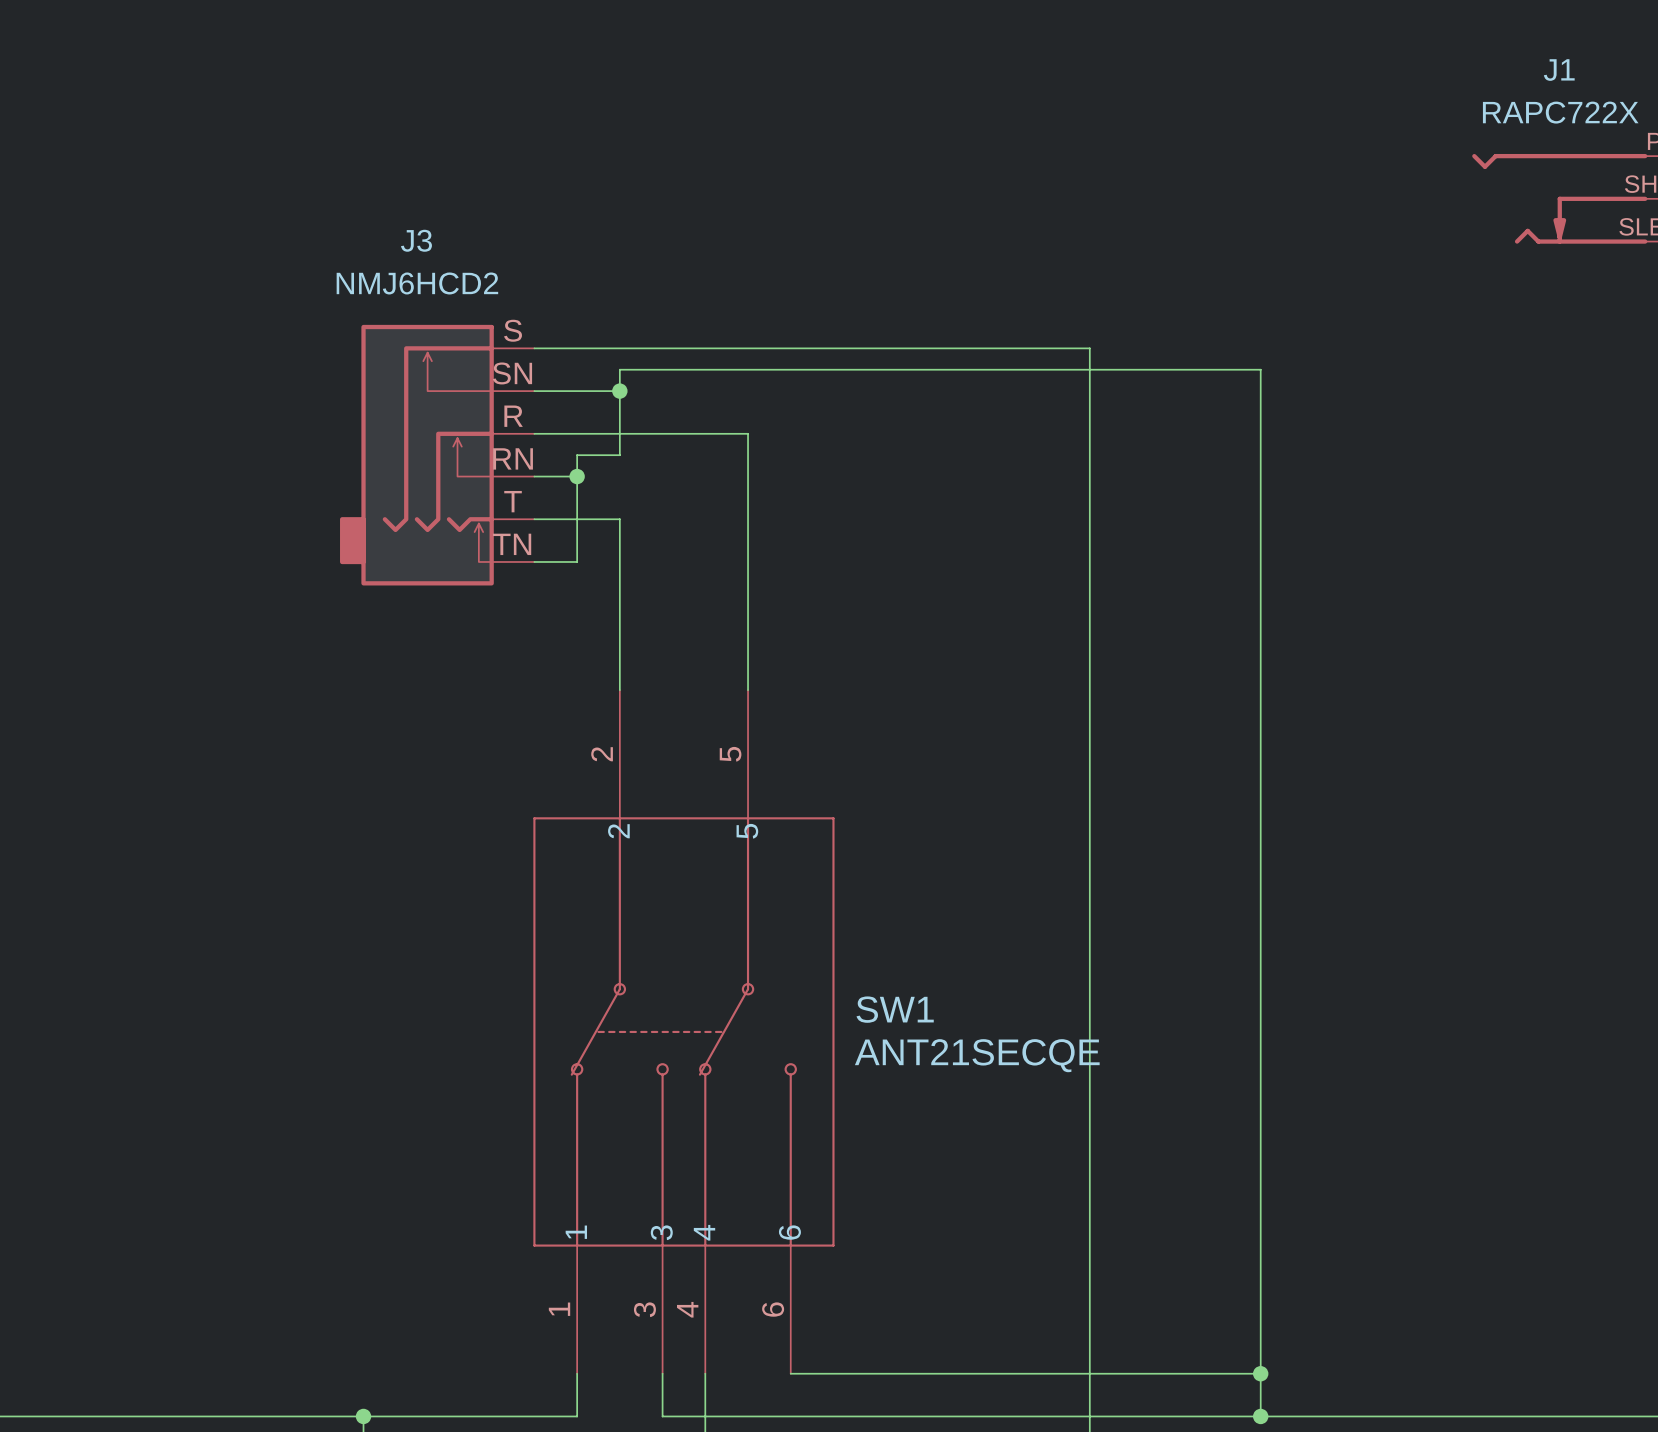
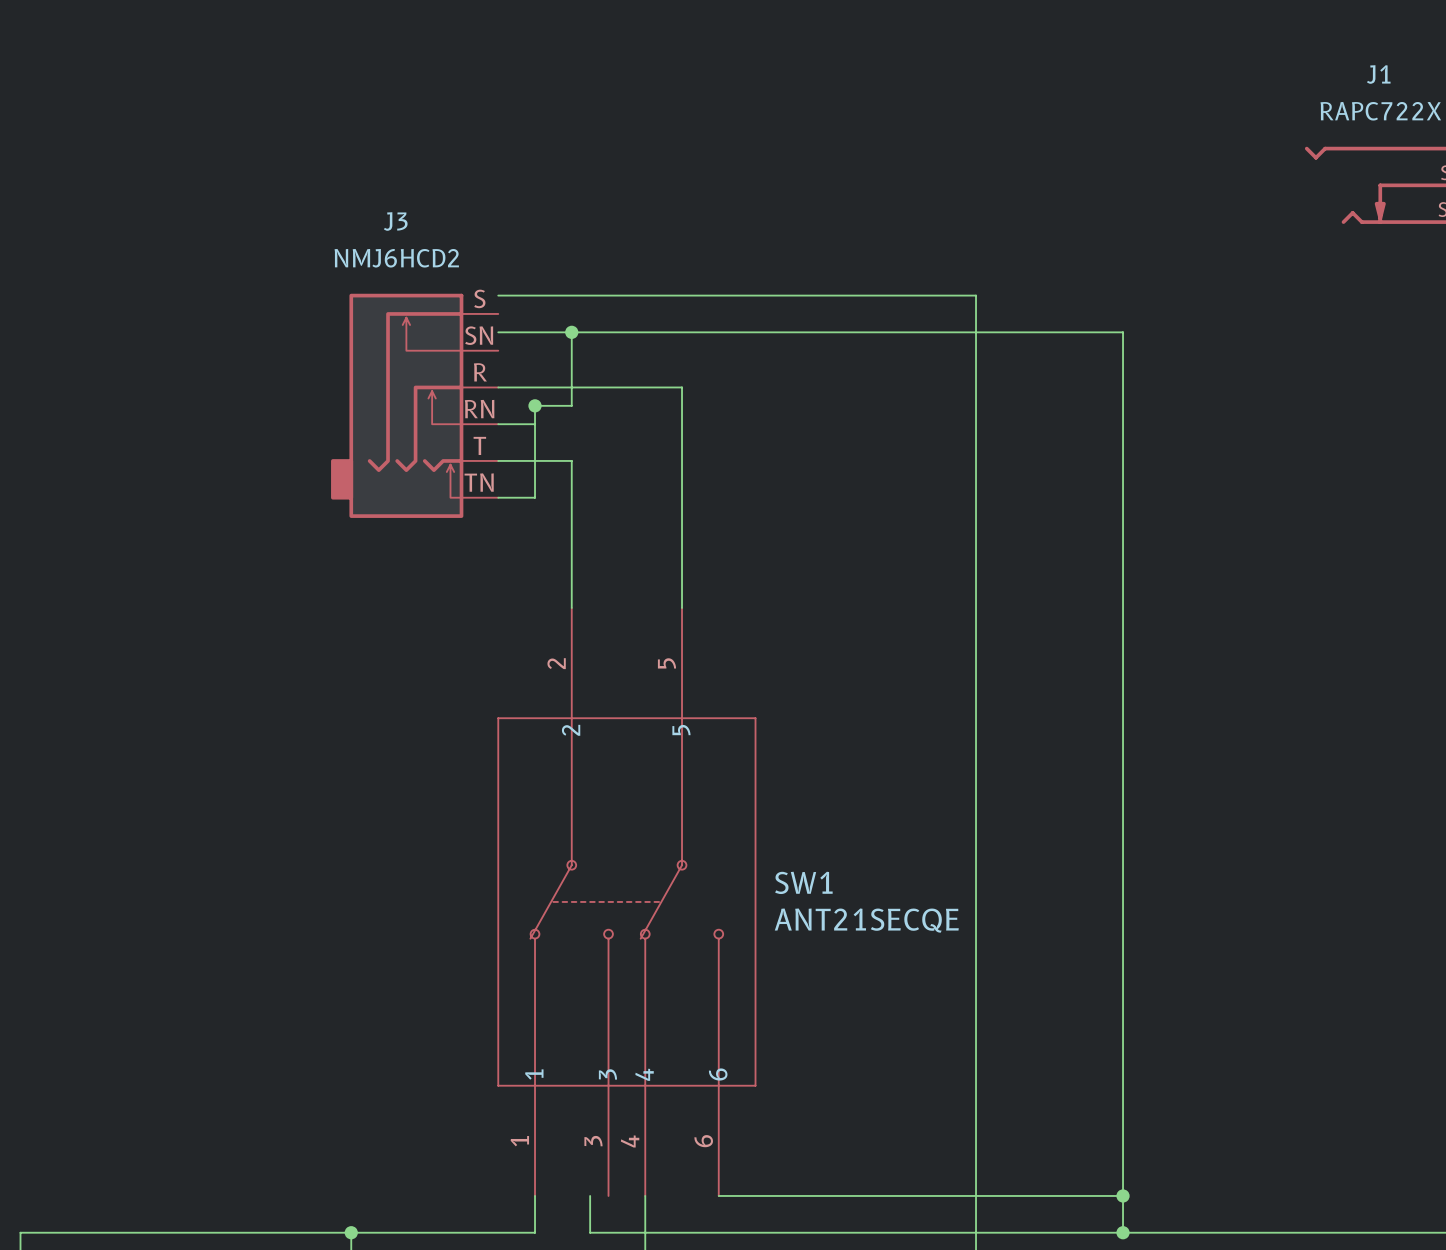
wire: (534, 348) (1089, 348) -> (498, 295) (976, 295) (976, 313)
wire: (534, 391) (619, 391) -> (498, 332) (571, 332)
junction position: (619, 391) -> (571, 332)
junction position: (577, 476) -> (535, 405)
wire: (662, 1373) (662, 1416) -> (590, 1195) (590, 1232) (608, 1232)

